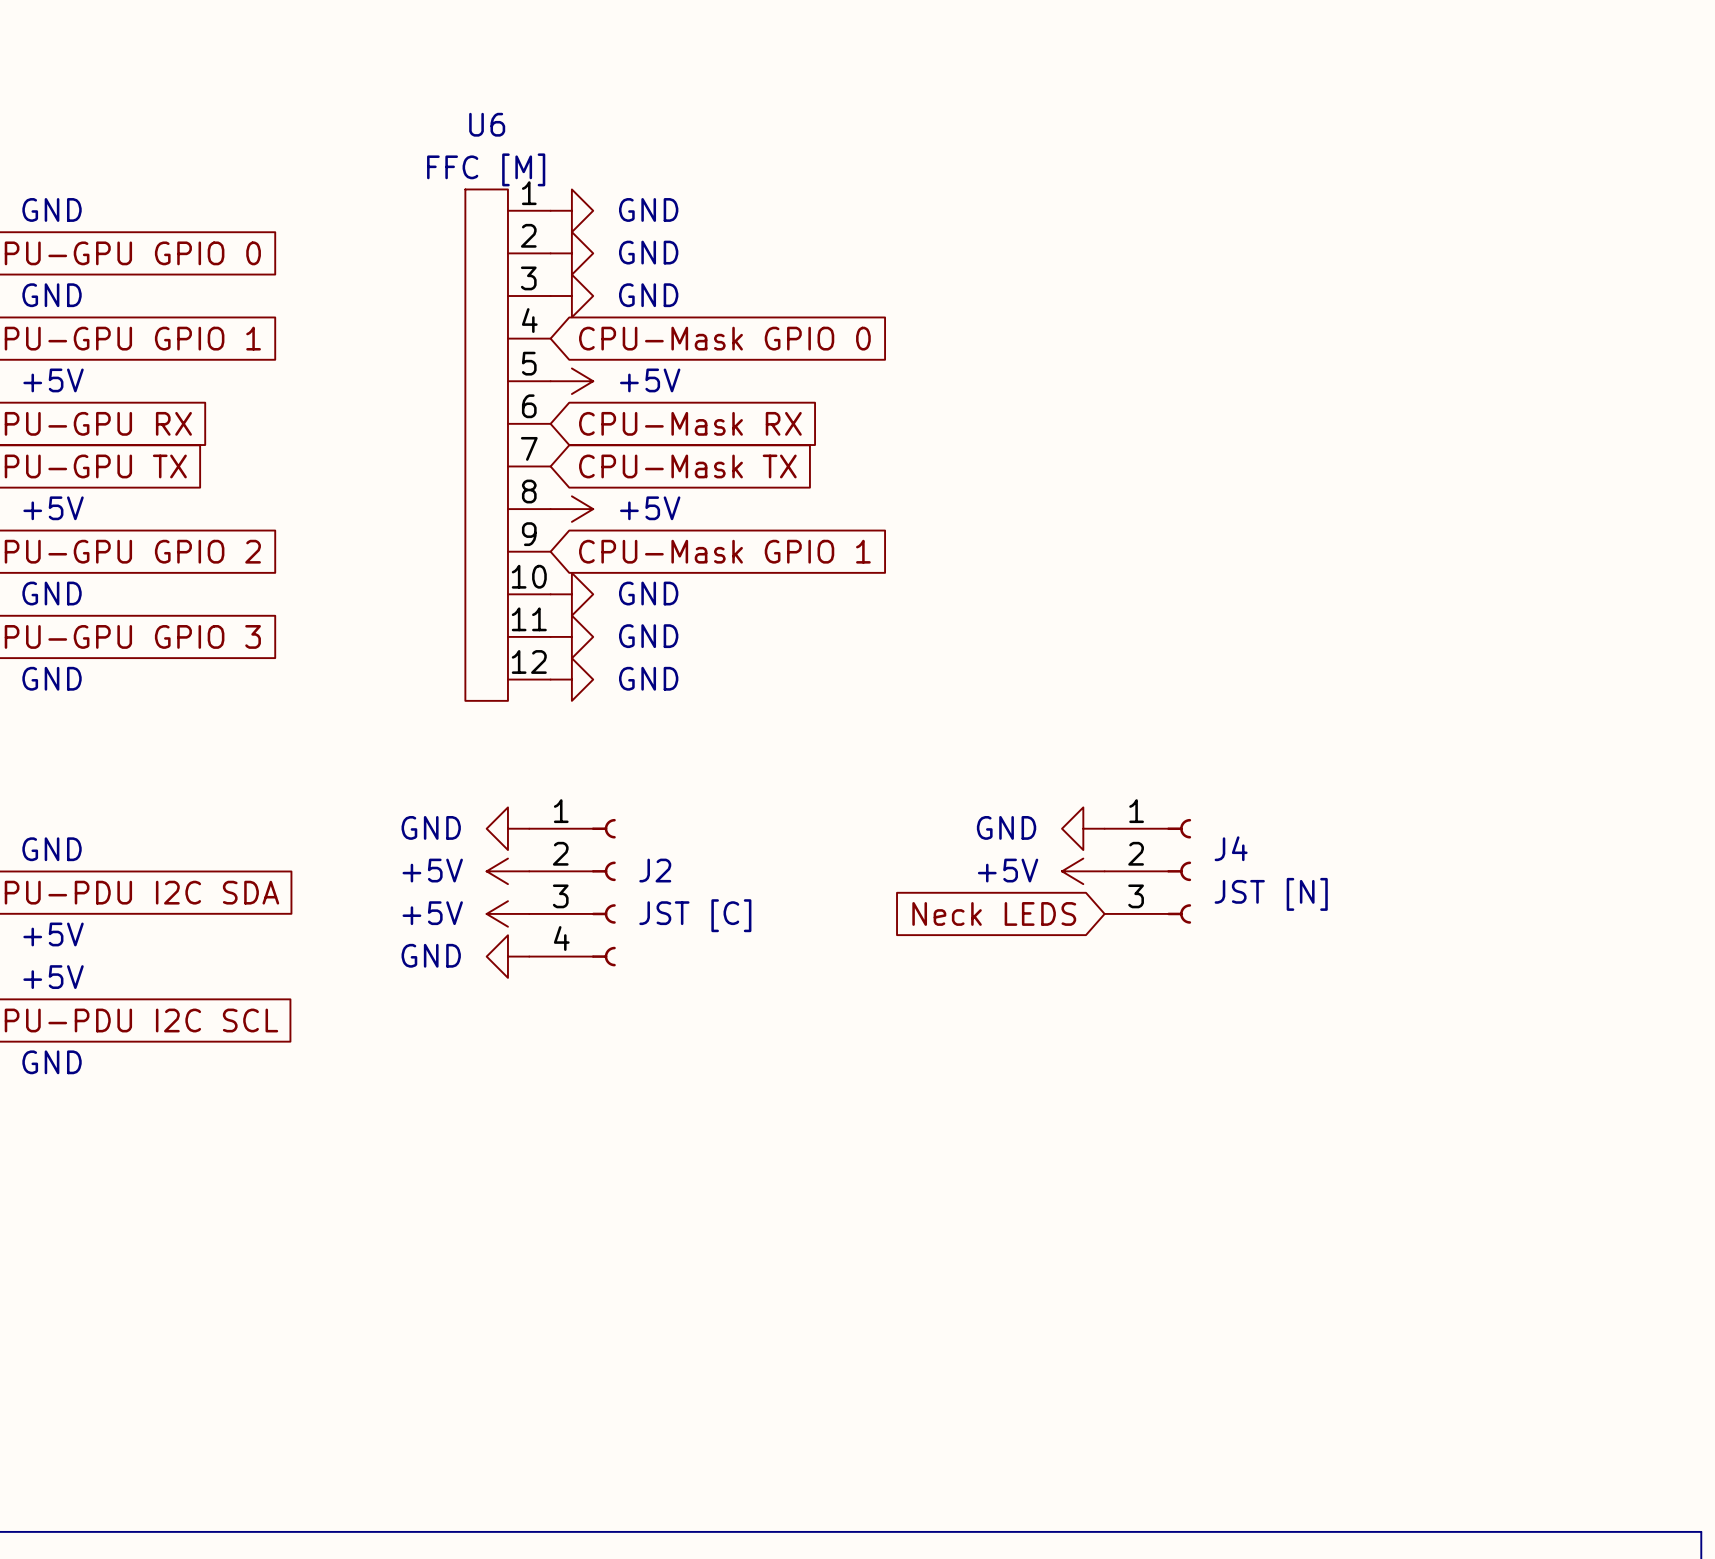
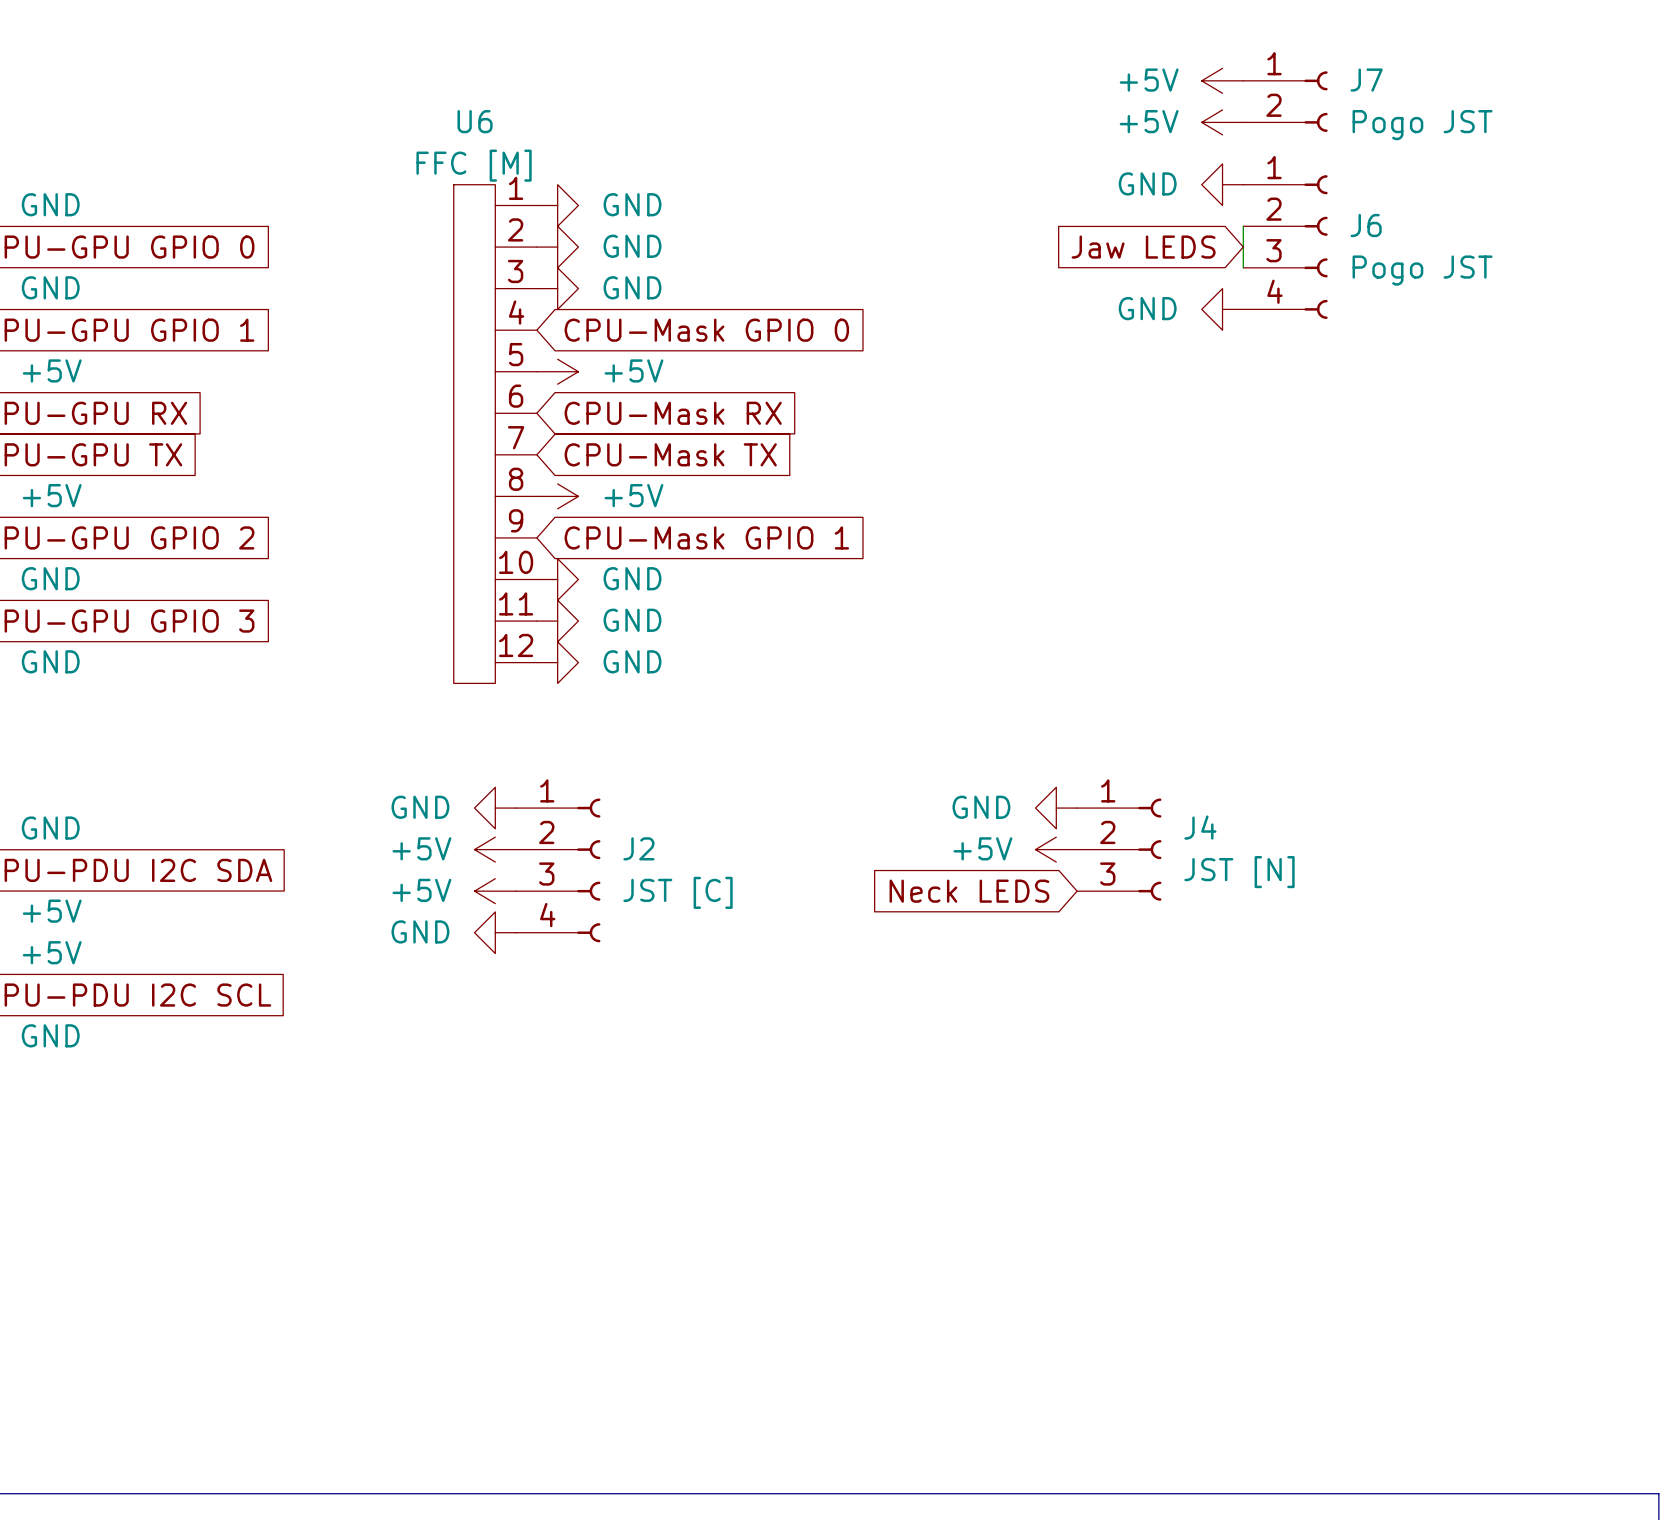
power symbol: none -> +5V (1222, 80)
J7: none -> Pogo JST (1285, 101)
power symbol: none -> +5V (1222, 122)
power symbol: none -> GND (1222, 184)
wire: none -> (1243, 226) (1243, 267)
global label: none -> Jaw LEDS (1143, 247)
J6: none -> Pogo JST (1285, 247)
power symbol: none -> GND (1222, 309)

